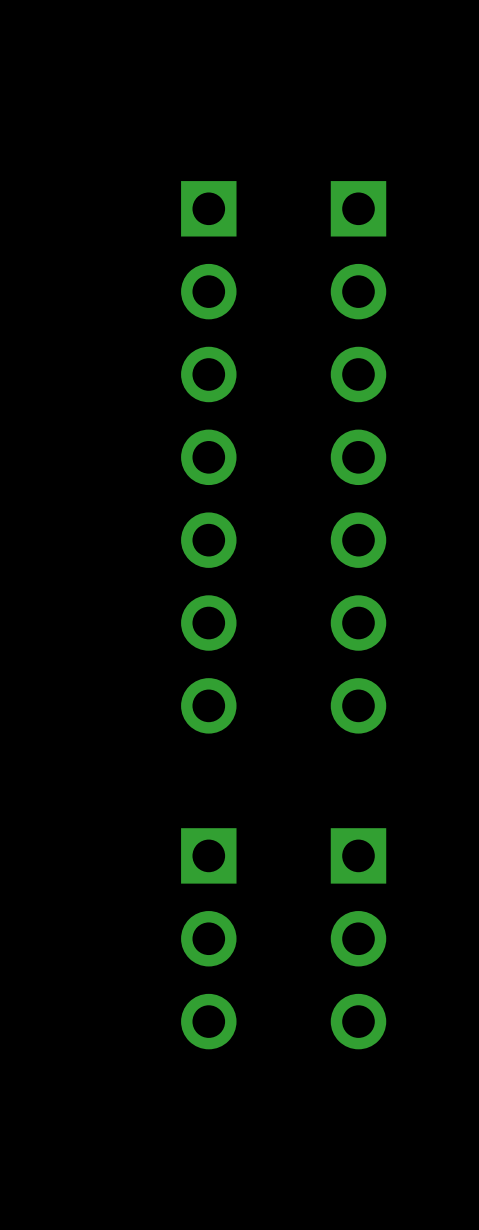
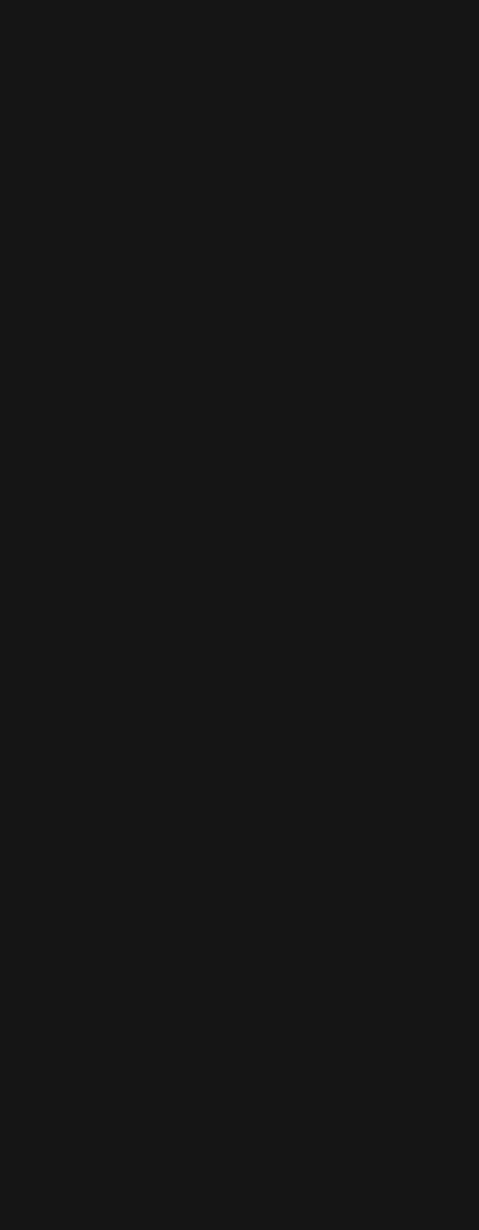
part: (208, 457) -> none
part: (358, 457) -> none
part: (208, 938) -> none
part: (358, 938) -> none

